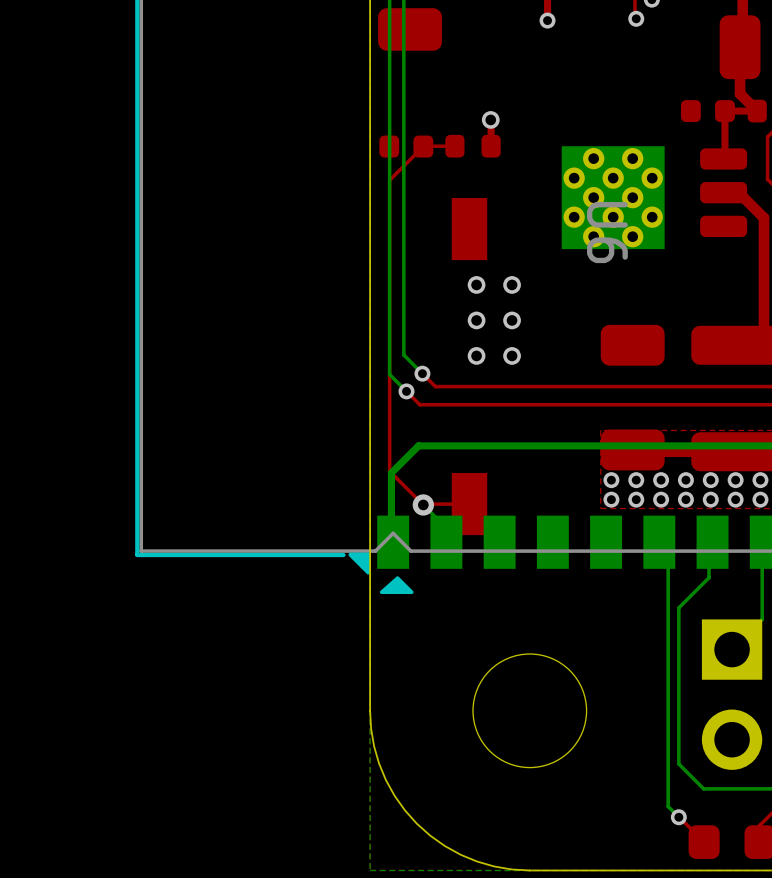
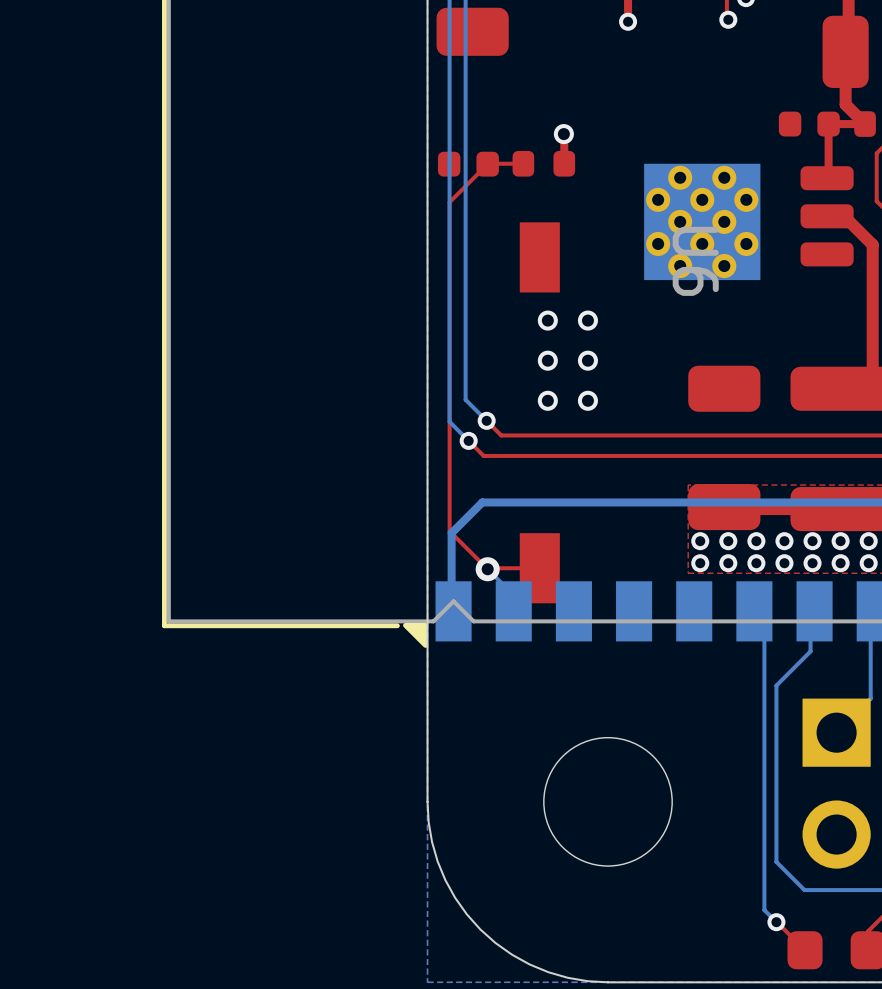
drawing: [379, 576, 414, 595] -> none

